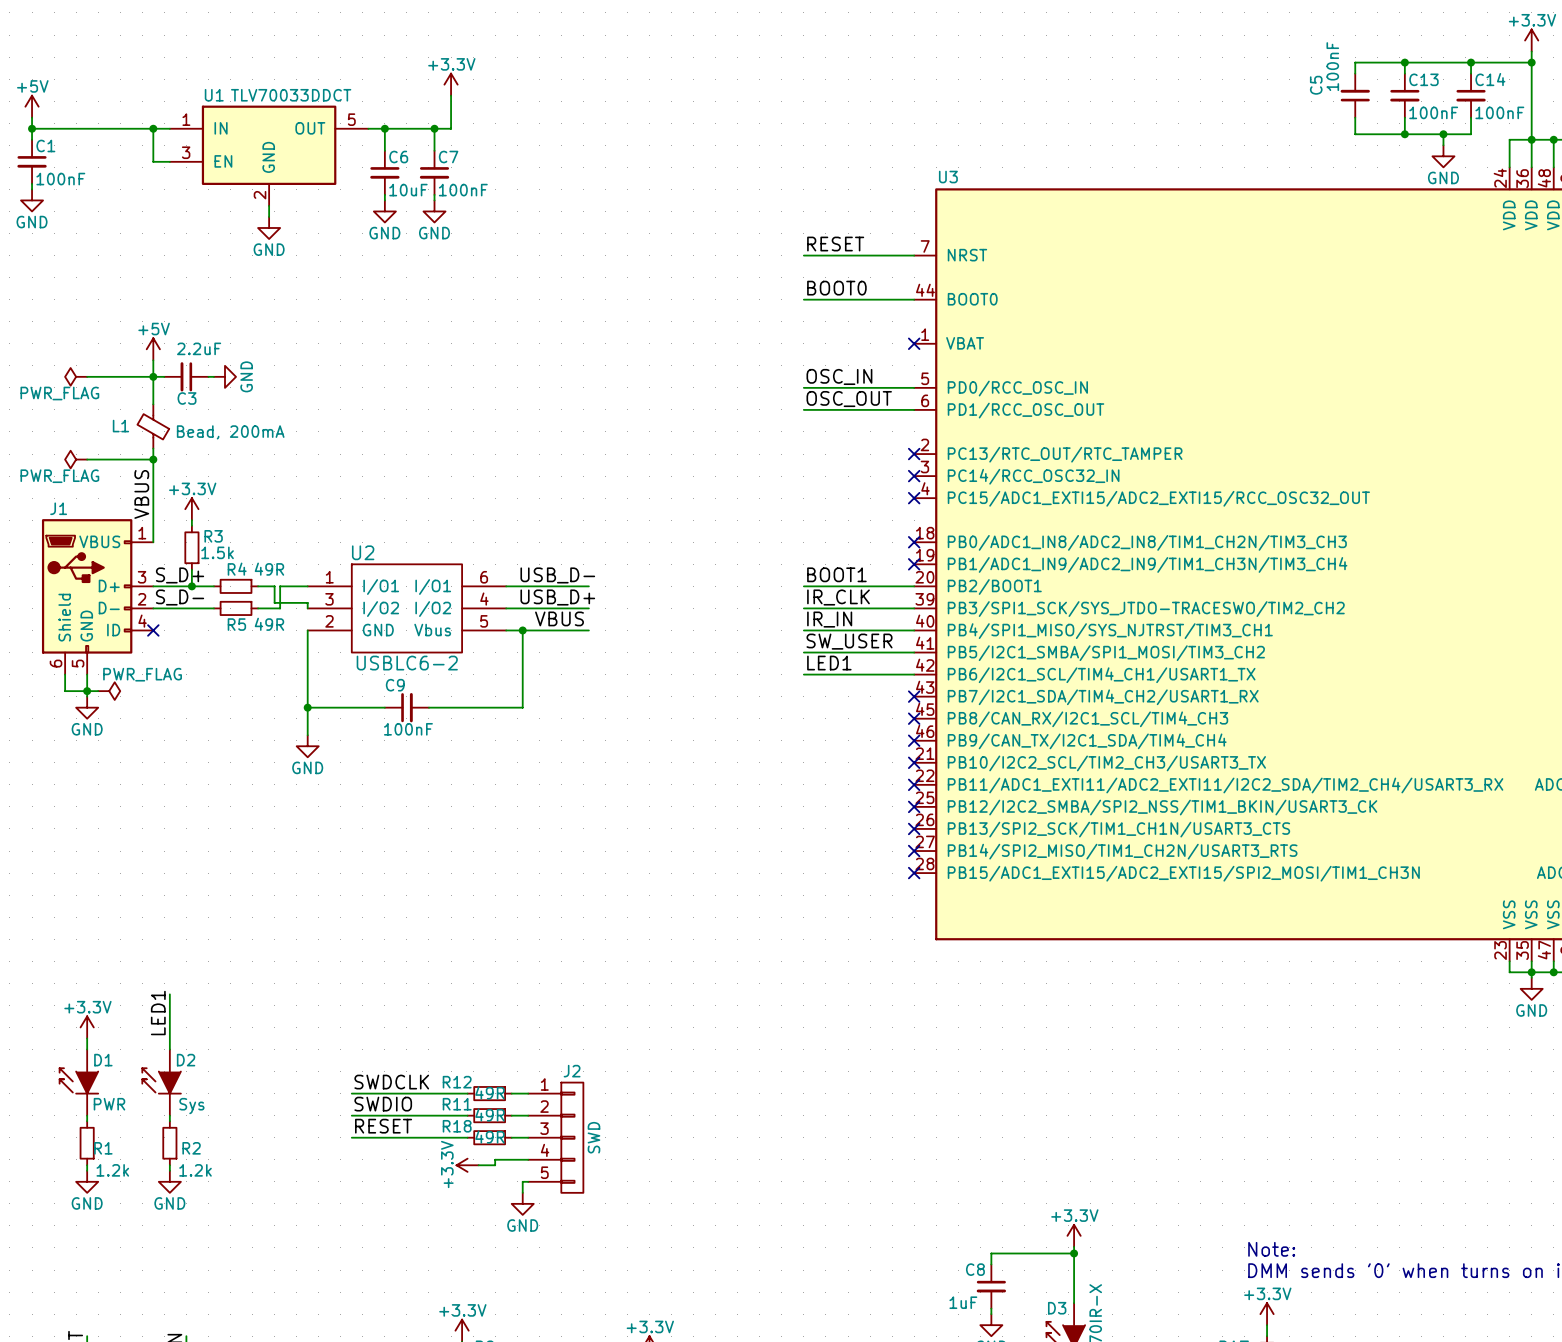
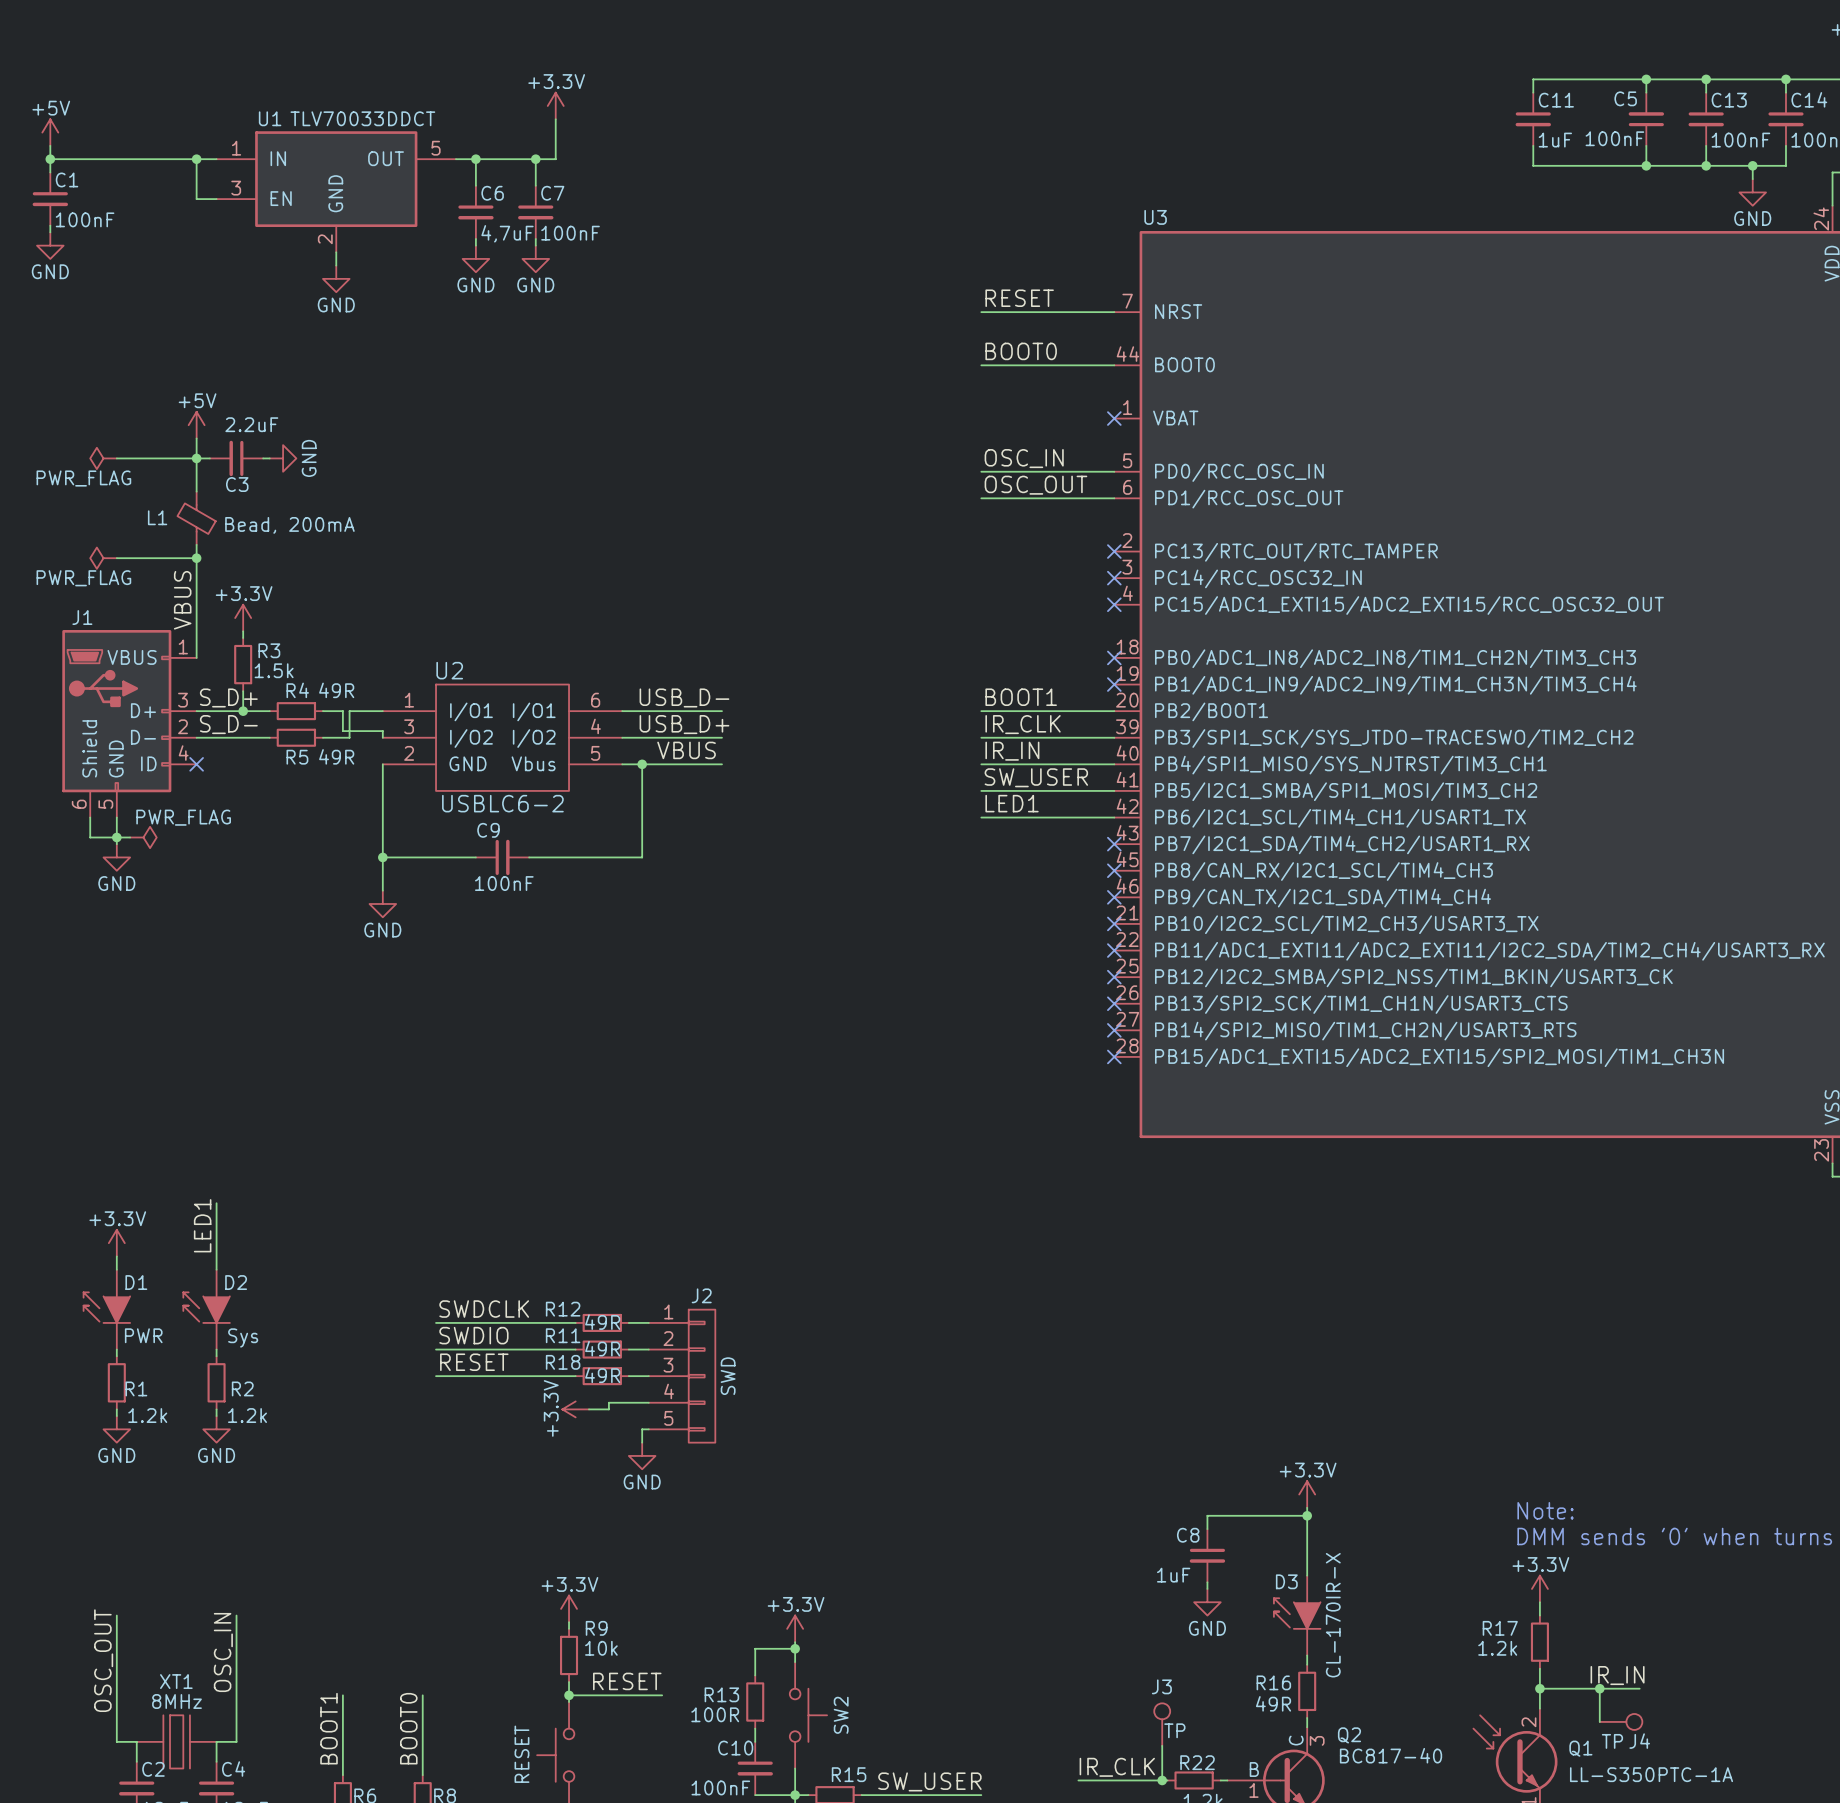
wire: none -> (1646, 79) (1533, 79) (1533, 92)
junction: none -> (1646, 79)
C5 value rotation: 0° (1332, 66) -> 90° clockwise (1614, 138)
C5 name rotation: 0° (1316, 85) -> 90° clockwise (1625, 98)
C11: none -> 1uF (1533, 119)
wire: none -> (1533, 145) (1533, 165) (1646, 165)
junction: none -> (1646, 165)
C6 value: 10uF (408, 190) -> 4,7uF (507, 233)

